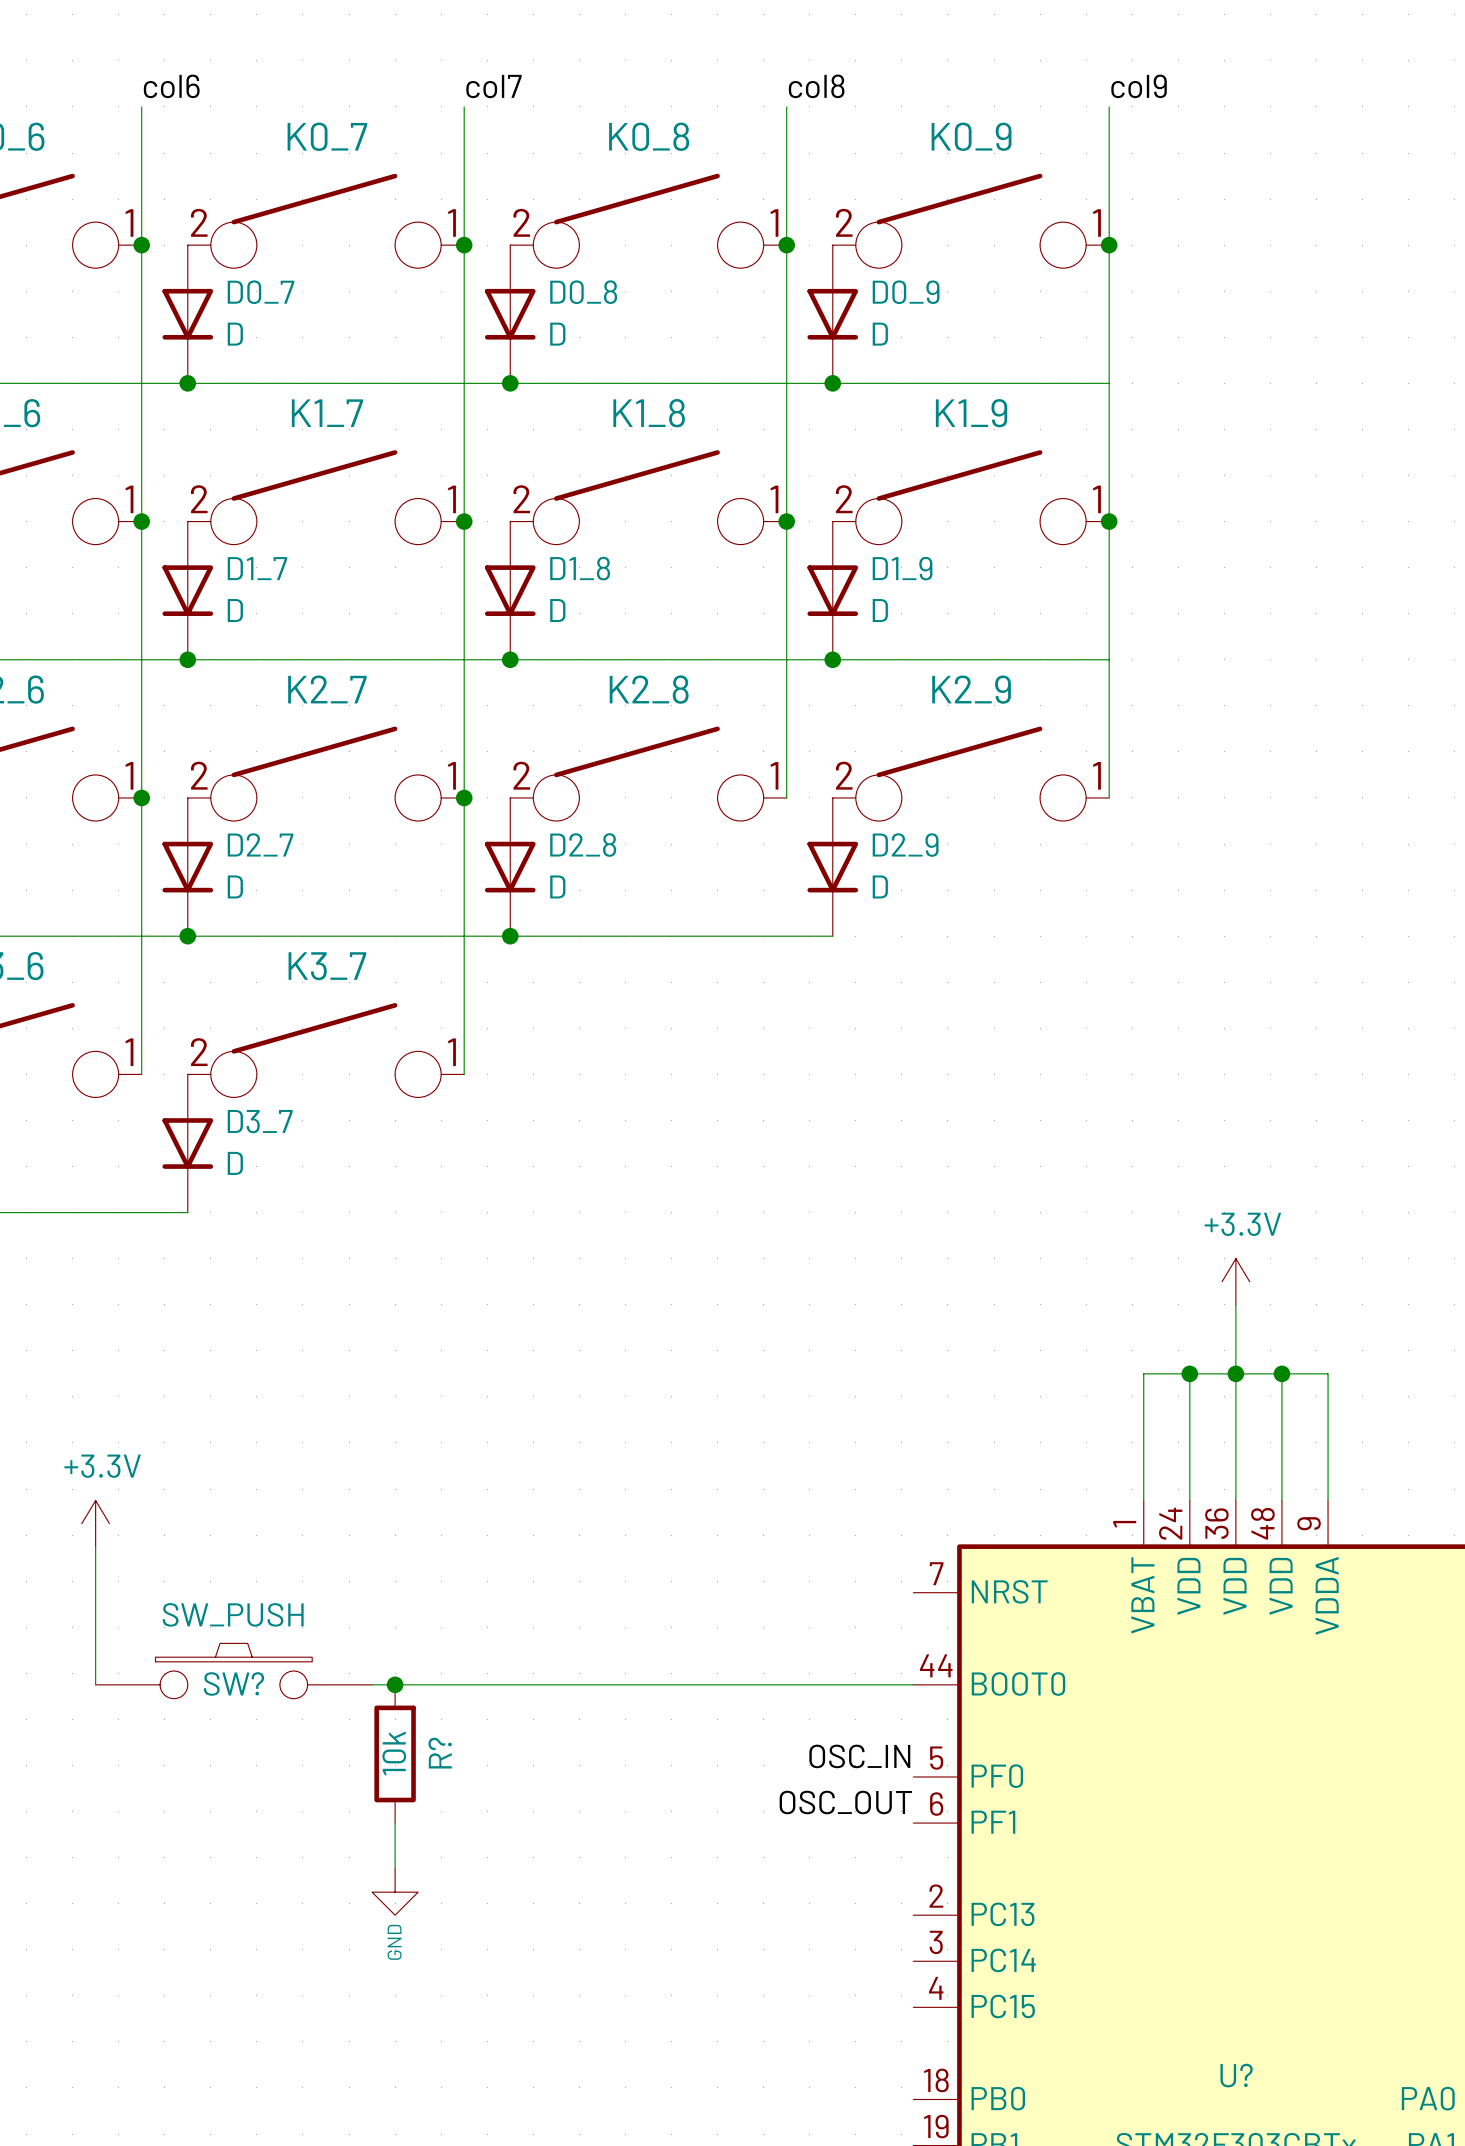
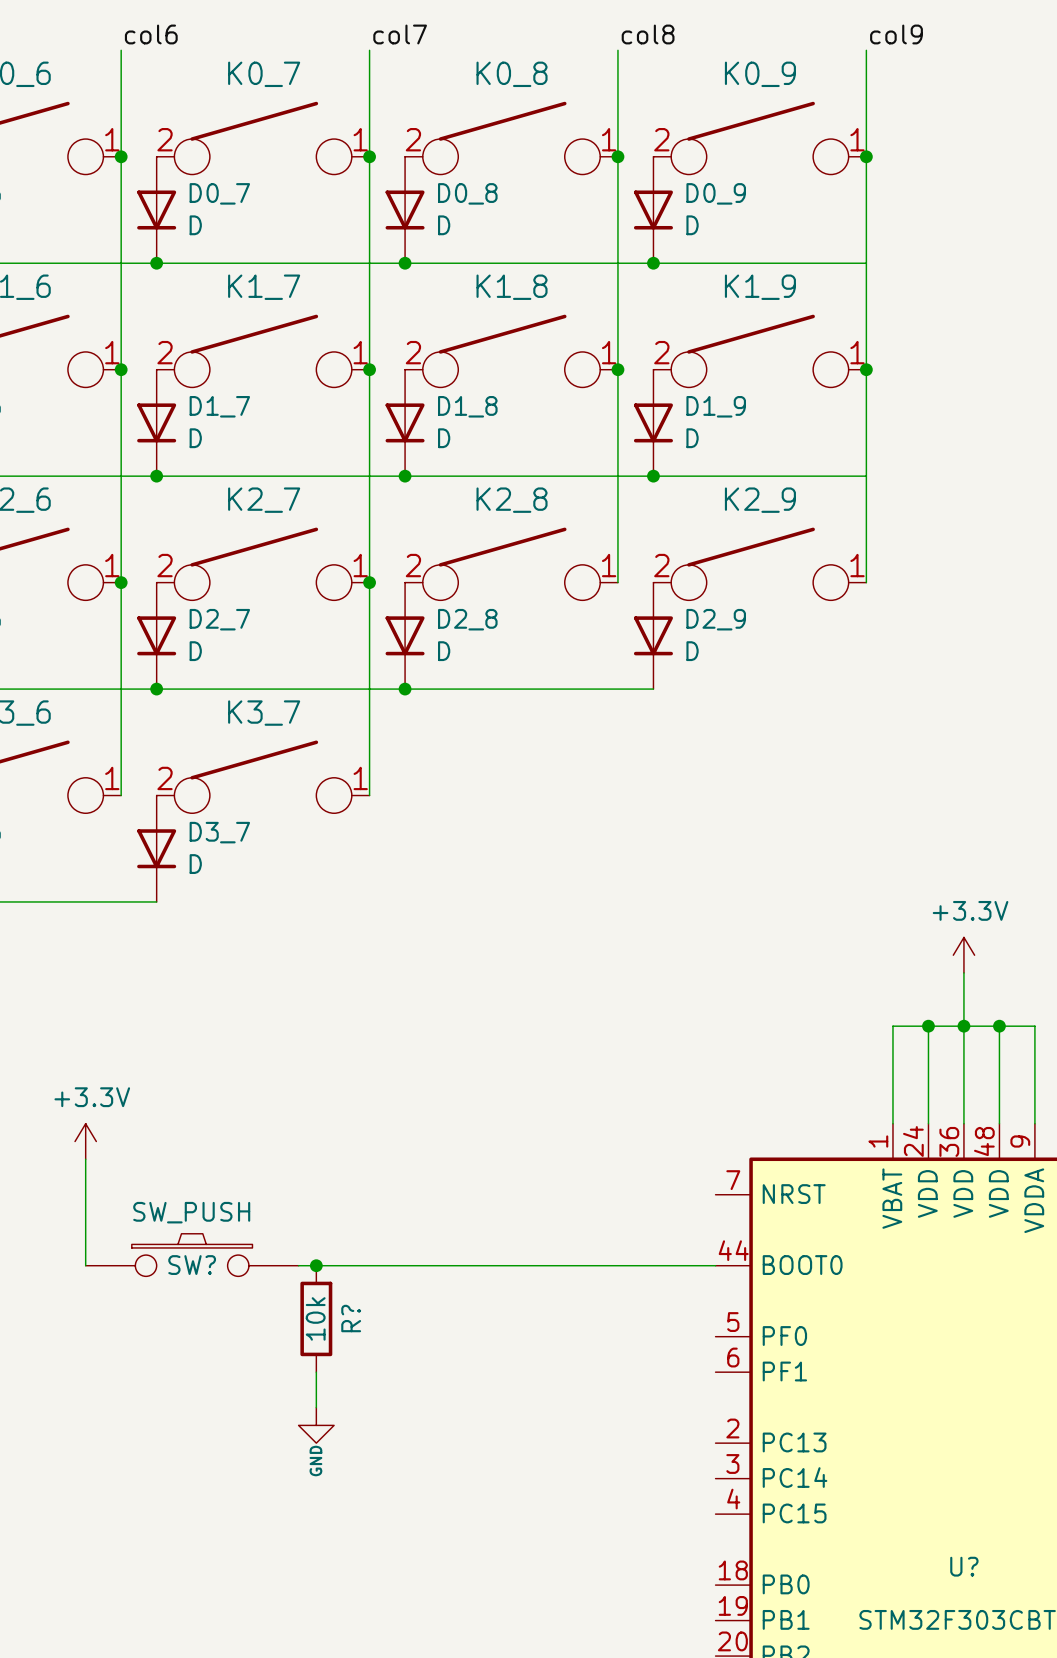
label: OSC_IN (859, 1756) -> none
label: OSC_OUT (845, 1802) -> none

